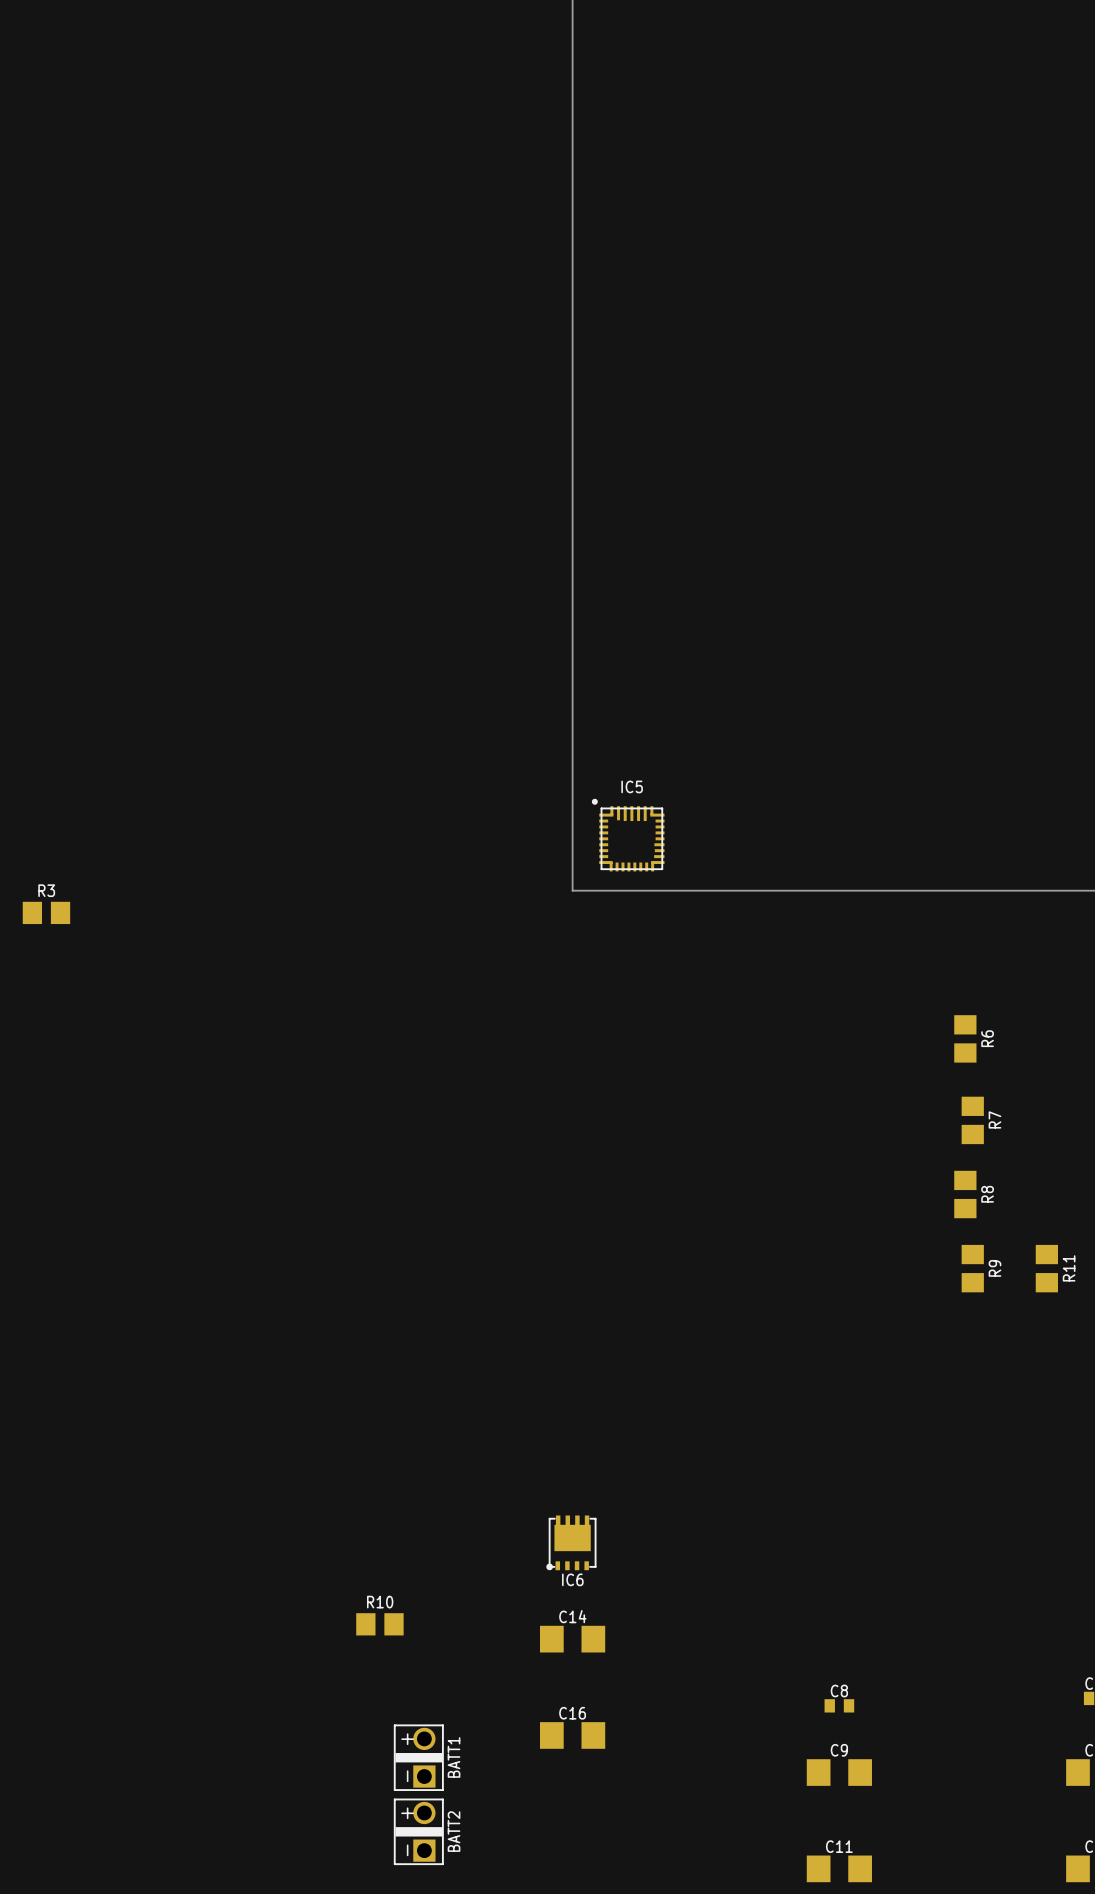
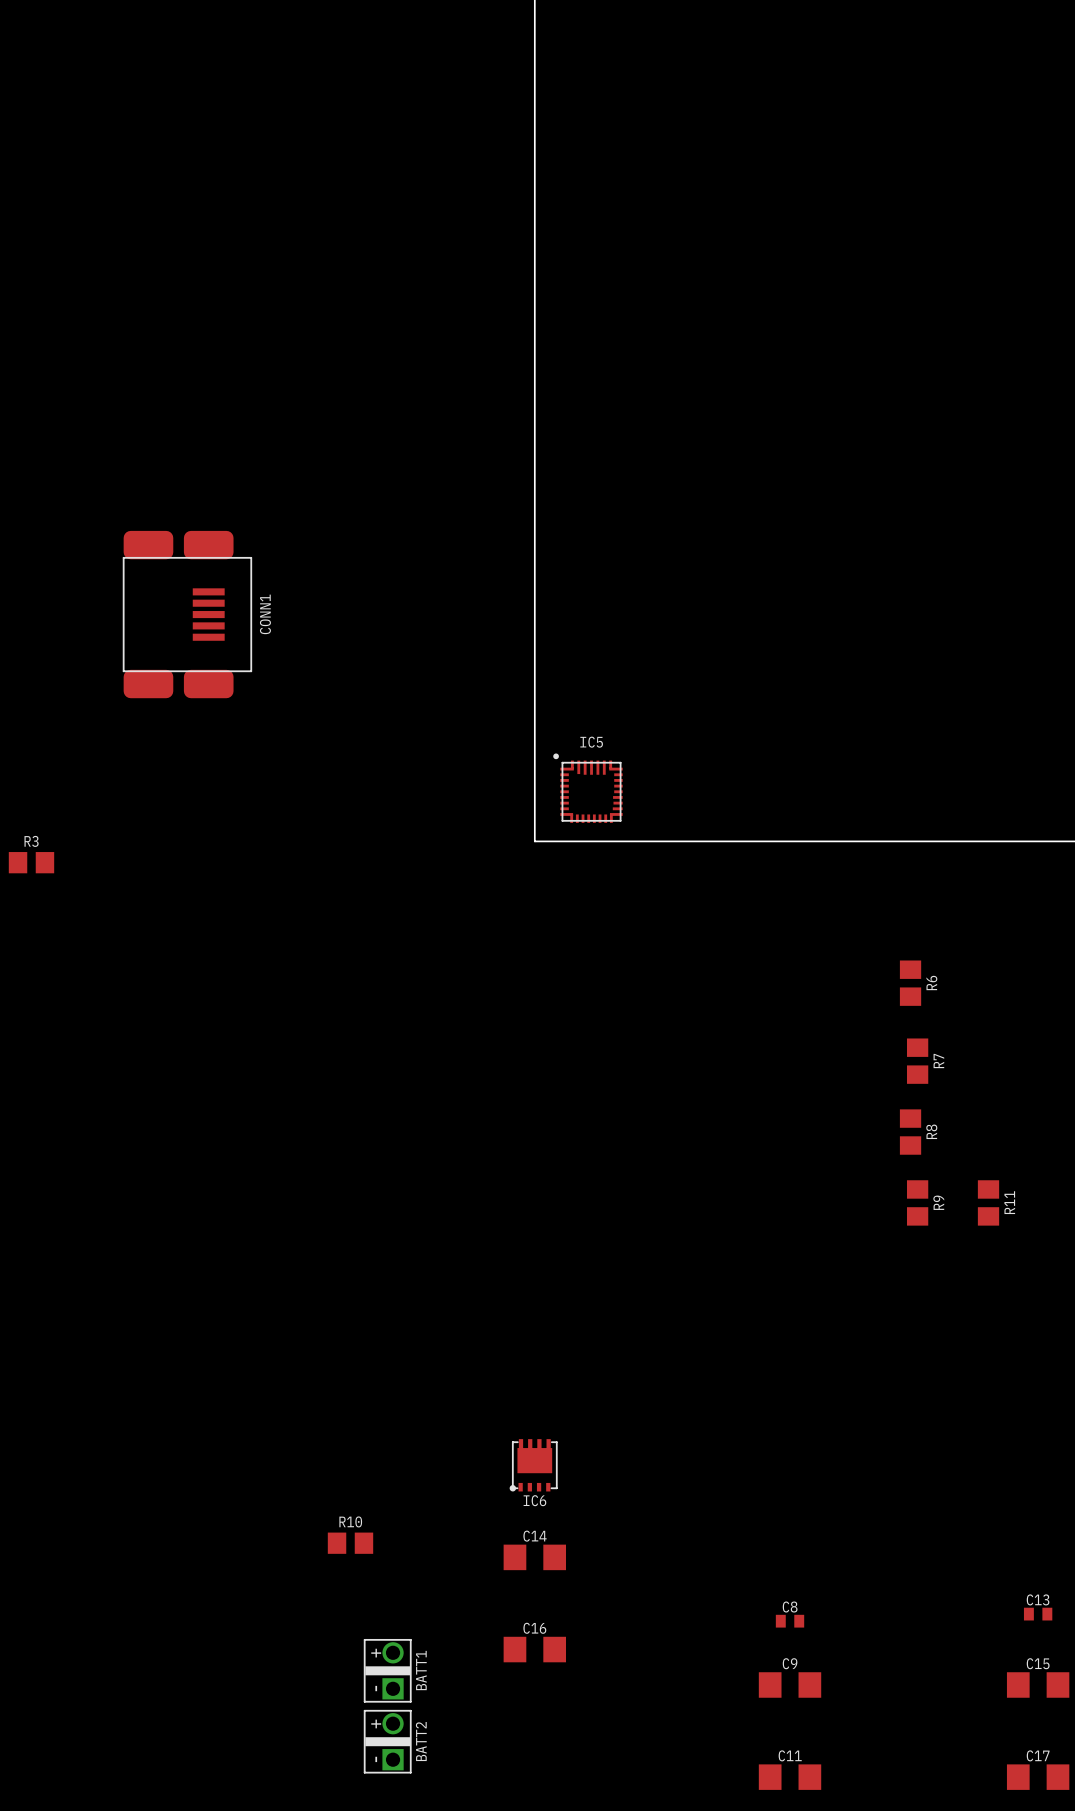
CONN1: none -> (187, 614)

